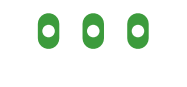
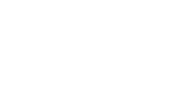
part: (93, 31) -> none

